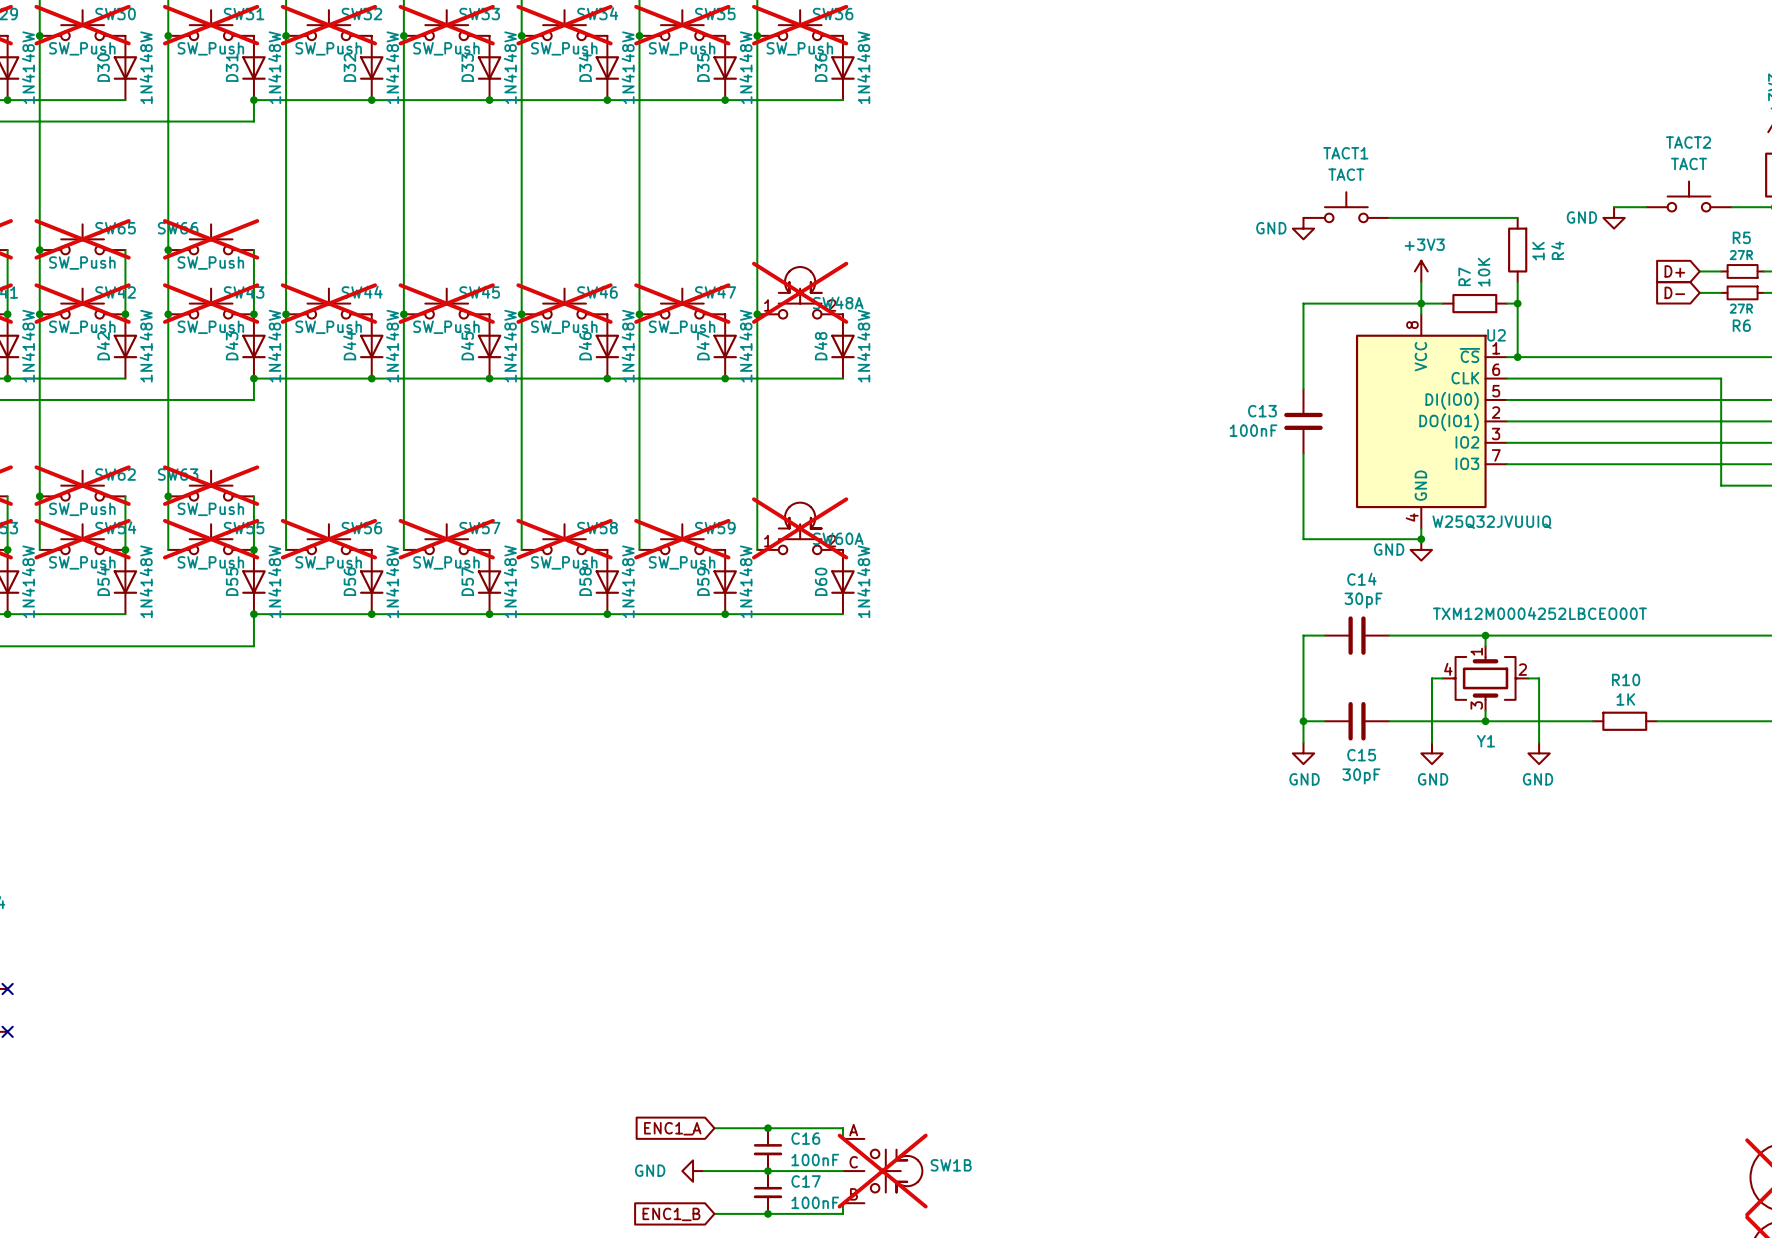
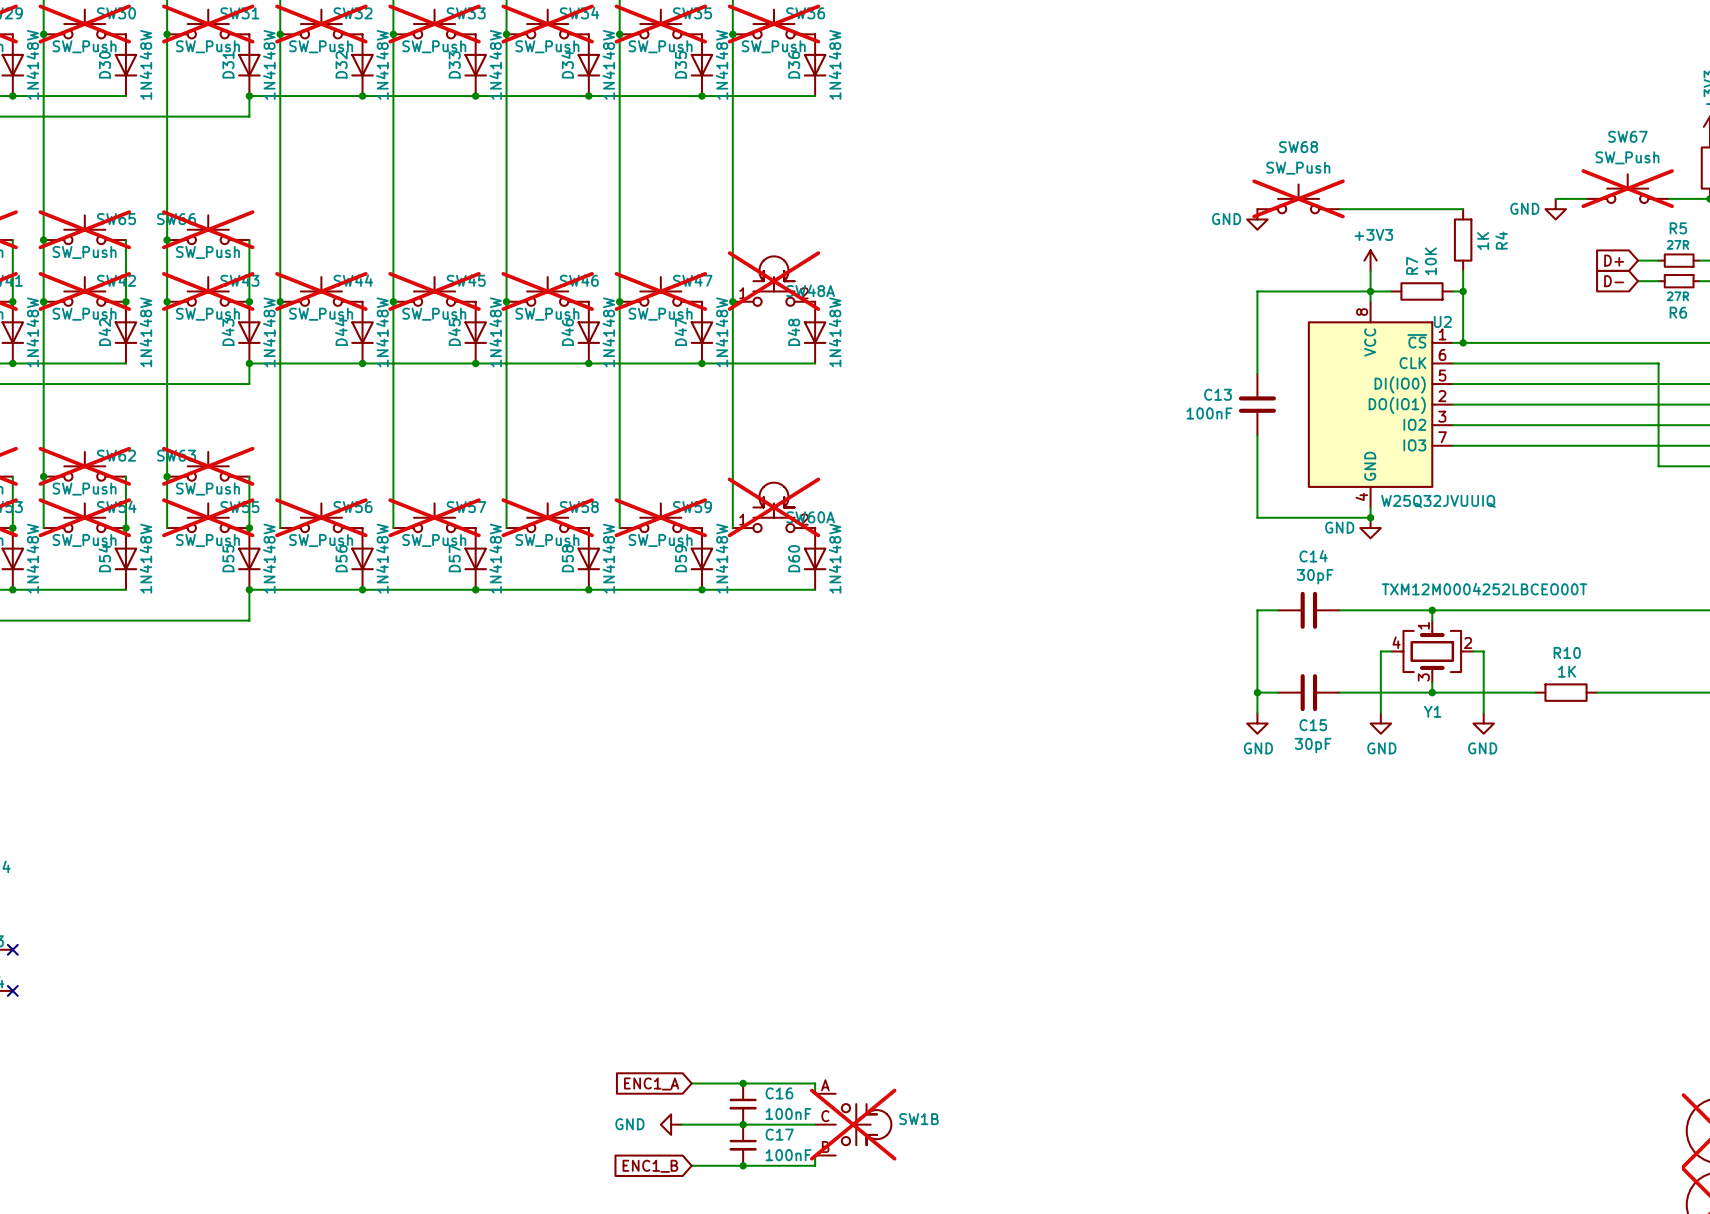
TACT2 name: TACT2 (1688, 142) -> SW67 (1627, 136)
TACT1 name: TACT1 (1345, 153) -> SW68 (1298, 147)
TACT2 value: TACT (1689, 163) -> SW_Push (1627, 157)
TACT1 value: TACT (1346, 174) -> SW_Push (1298, 168)
TACT2 do-not-place cross: none -> (1627, 188)
TACT1 do-not-place cross: none -> (1298, 198)

